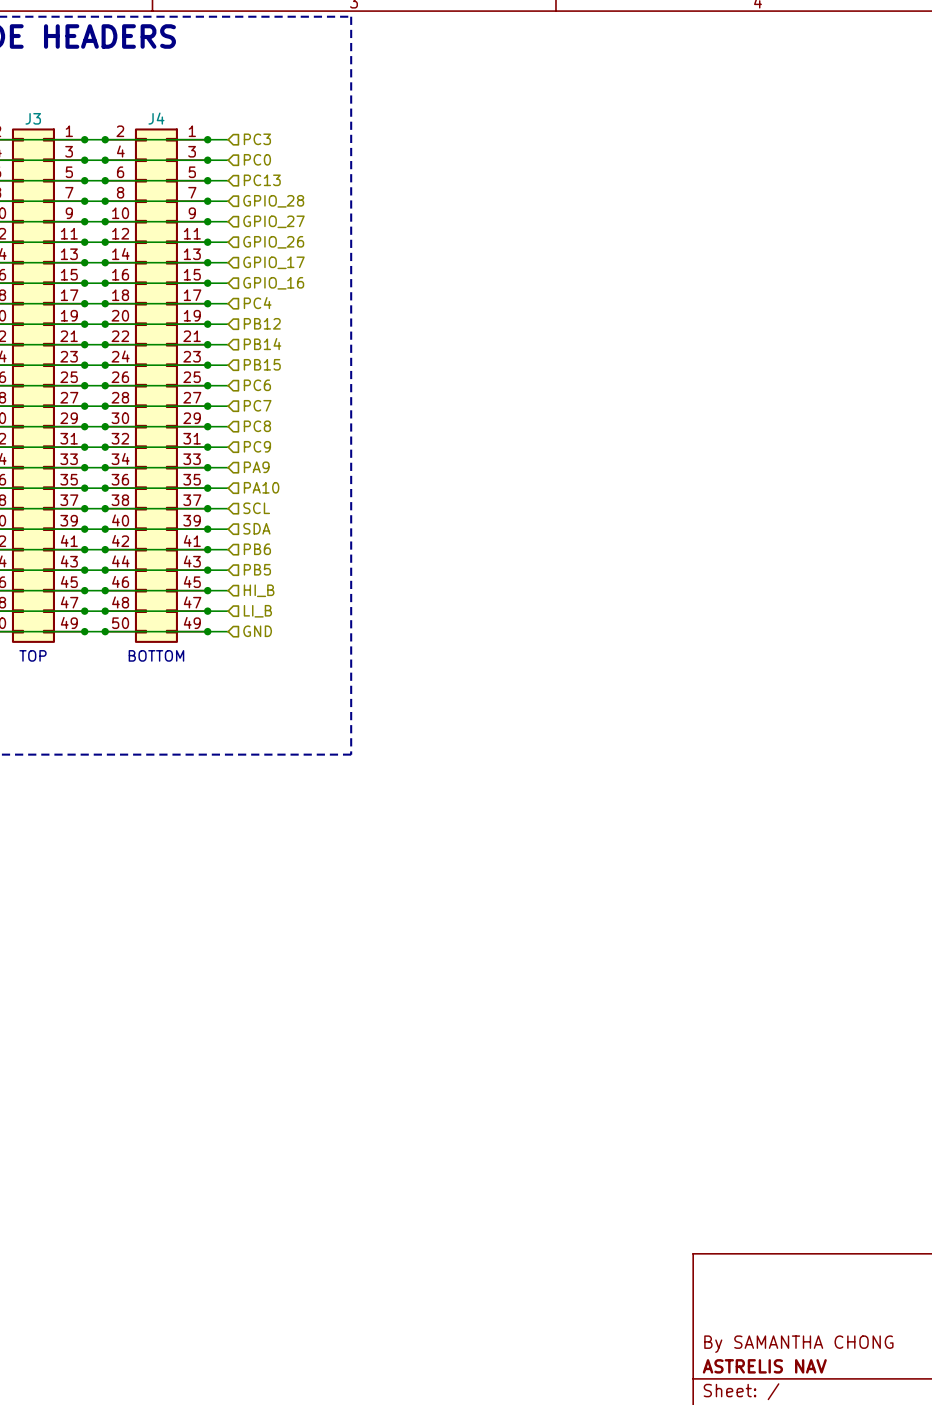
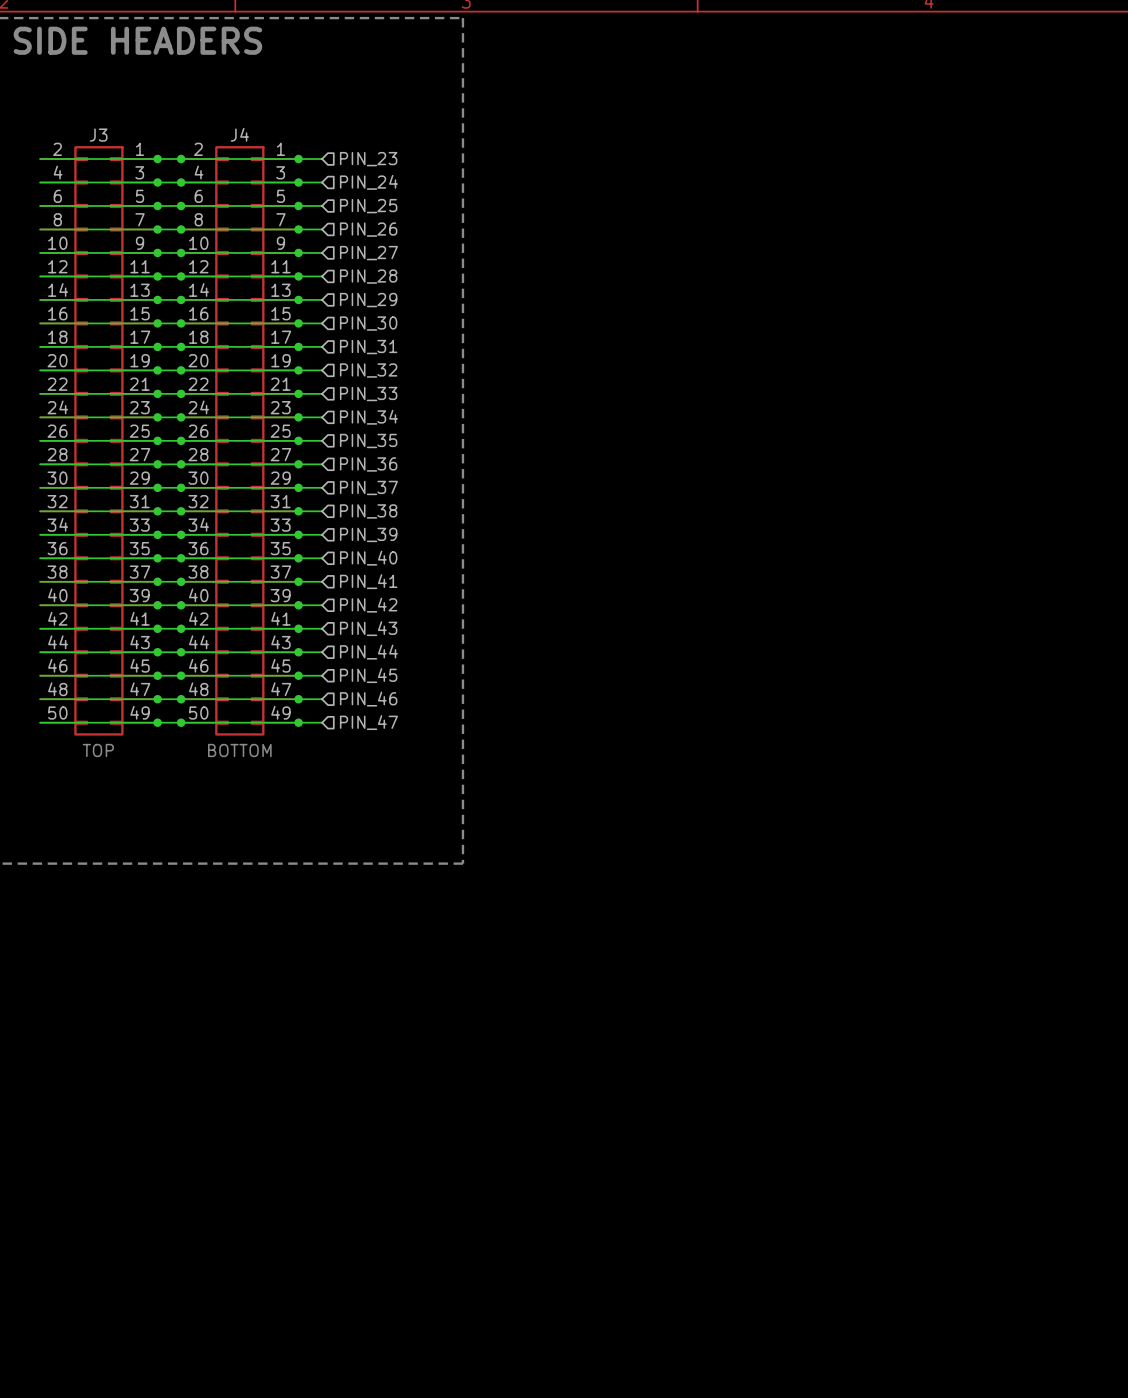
hierarchical label: PC3 (257, 139) -> PIN_23 (368, 159)
hierarchical label: PC0 (257, 159) -> PIN_24 (368, 182)
hierarchical label: PC13 (262, 180) -> PIN_25 (368, 206)
hierarchical label: GPIO_28 (273, 201) -> PIN_26 (368, 229)
hierarchical label: GPIO_27 (273, 221) -> PIN_27 (368, 253)
hierarchical label: GPIO_26 (273, 242) -> PIN_28 (368, 276)
hierarchical label: GPIO_17 (273, 262) -> PIN_29 (368, 300)
hierarchical label: GPIO_16 (273, 283) -> PIN_30 (368, 323)
hierarchical label: PC4 (257, 303) -> PIN_31 (368, 347)
hierarchical label: PB12 (262, 323) -> PIN_32 (368, 370)
hierarchical label: PB14 (262, 344) -> PIN_33 (368, 394)
hierarchical label: PB15 (262, 364) -> PIN_34 (368, 417)
hierarchical label: PC6 (257, 385) -> PIN_35 (368, 440)
hierarchical label: PC7 (257, 405) -> PIN_36 (368, 464)
hierarchical label: PC8 (257, 426) -> PIN_37 (368, 487)
hierarchical label: PC9 (257, 446) -> PIN_38 (368, 511)
hierarchical label: PA9 (256, 467) -> PIN_39 (368, 534)
hierarchical label: PA10 (261, 487) -> PIN_40 (368, 558)
hierarchical label: SCL (256, 508) -> PIN_41 (368, 581)
hierarchical label: SDA (256, 528) -> PIN_42 (368, 605)
hierarchical label: PB6 (257, 549) -> PIN_43 (368, 628)
hierarchical label: PB5 (257, 569) -> PIN_44 (368, 652)
hierarchical label: HI_B (259, 590) -> PIN_45 (368, 675)
hierarchical label: LI_B (257, 611) -> PIN_46 (368, 699)
hierarchical label: GND (257, 631) -> PIN_47 (368, 722)

